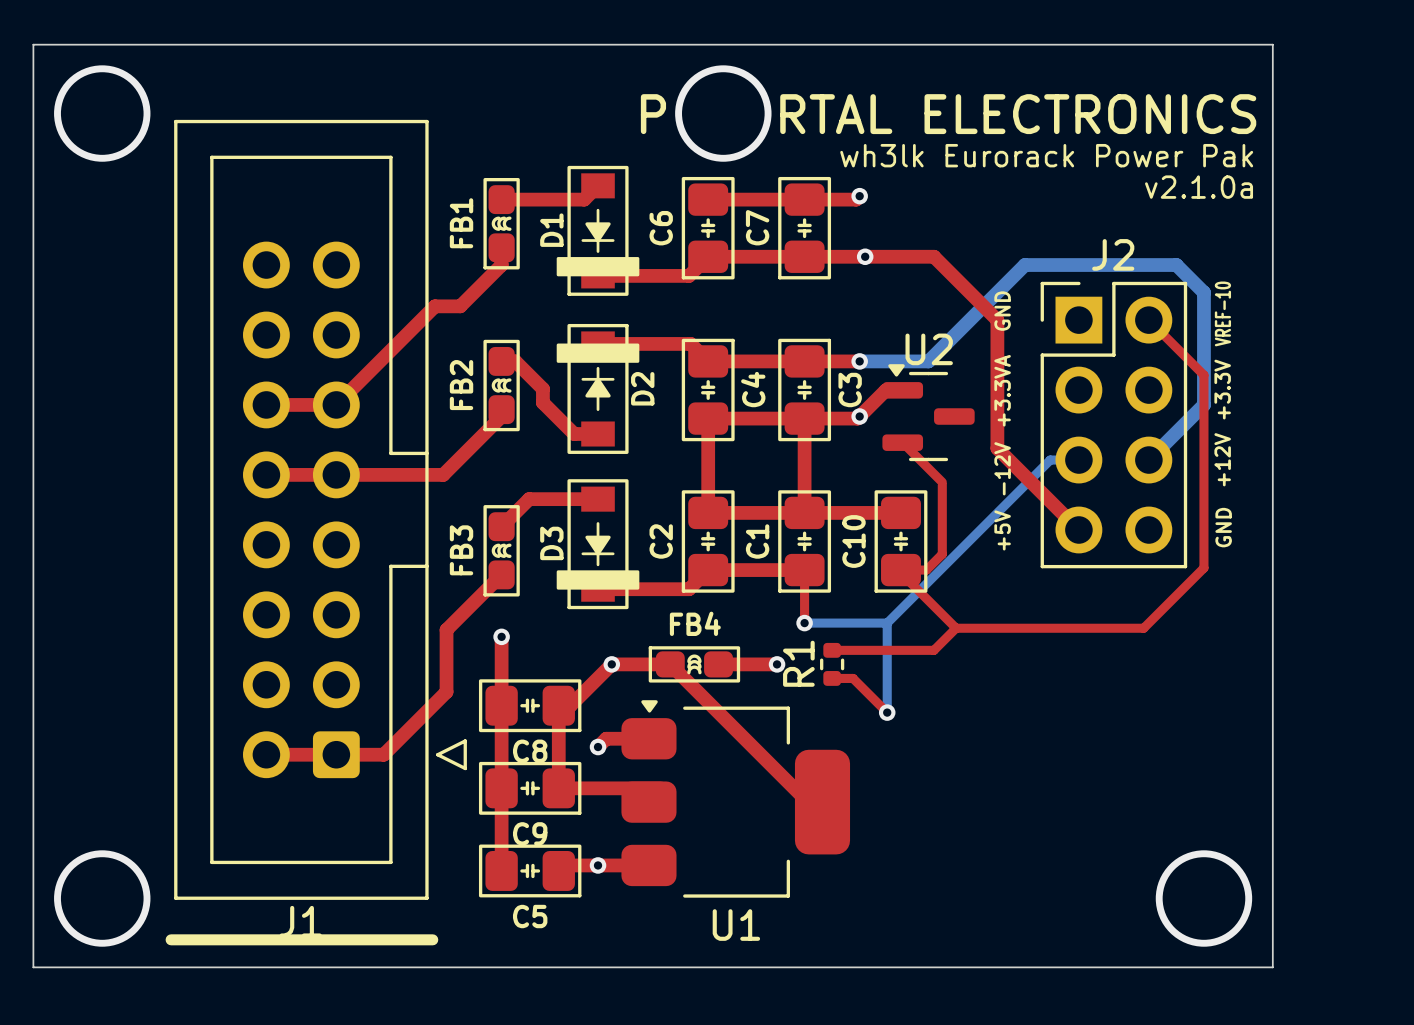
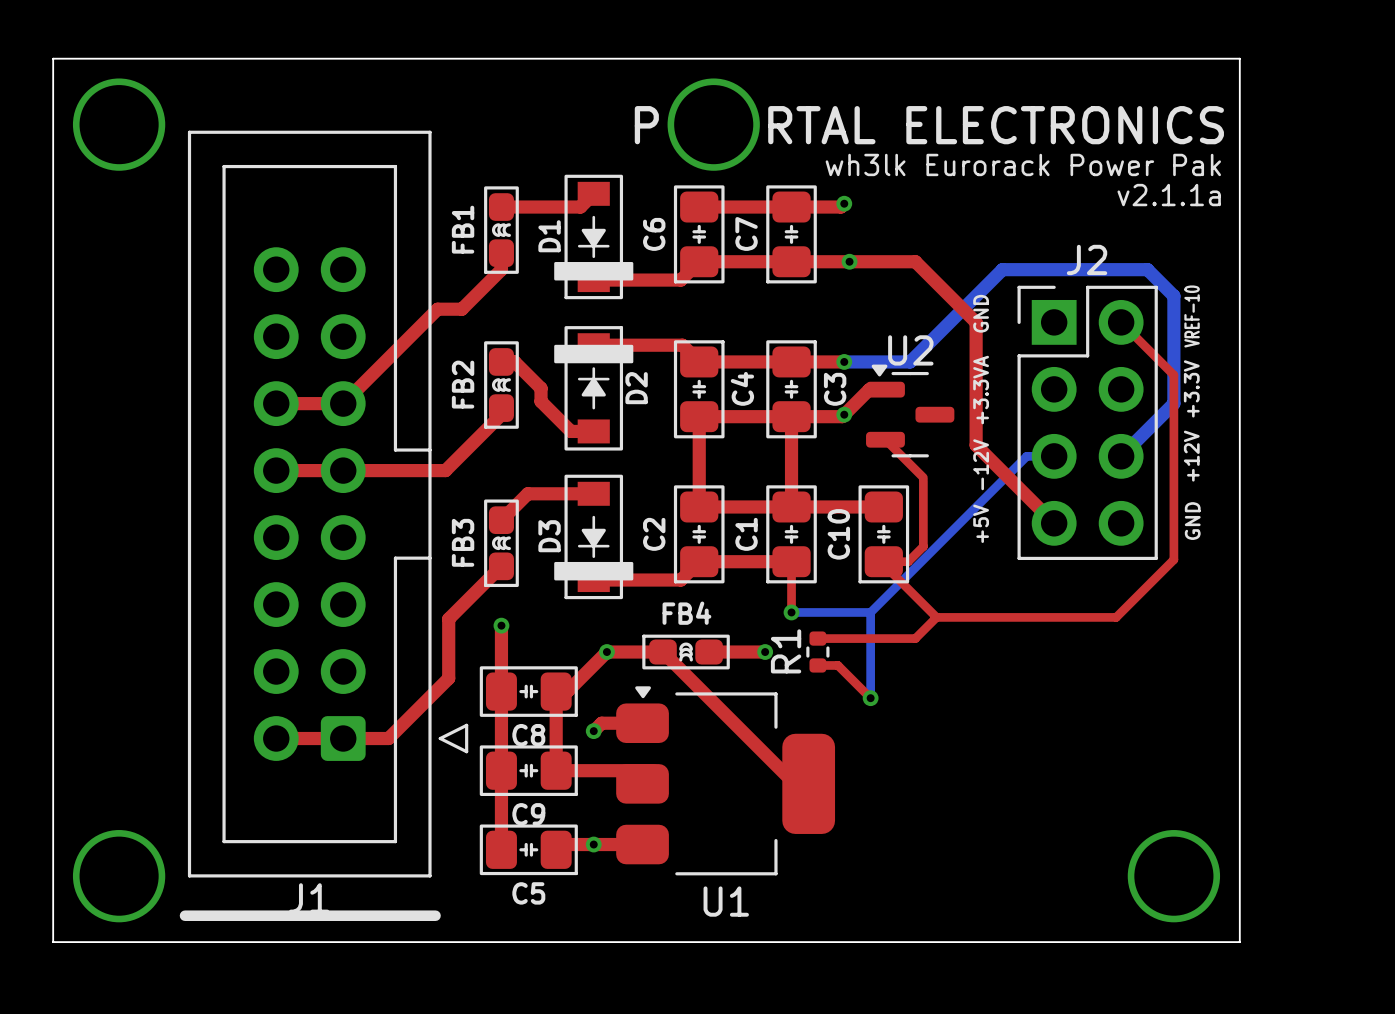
text: v2.1.0a (1199, 187) -> v2.1.1a (1169, 195)

